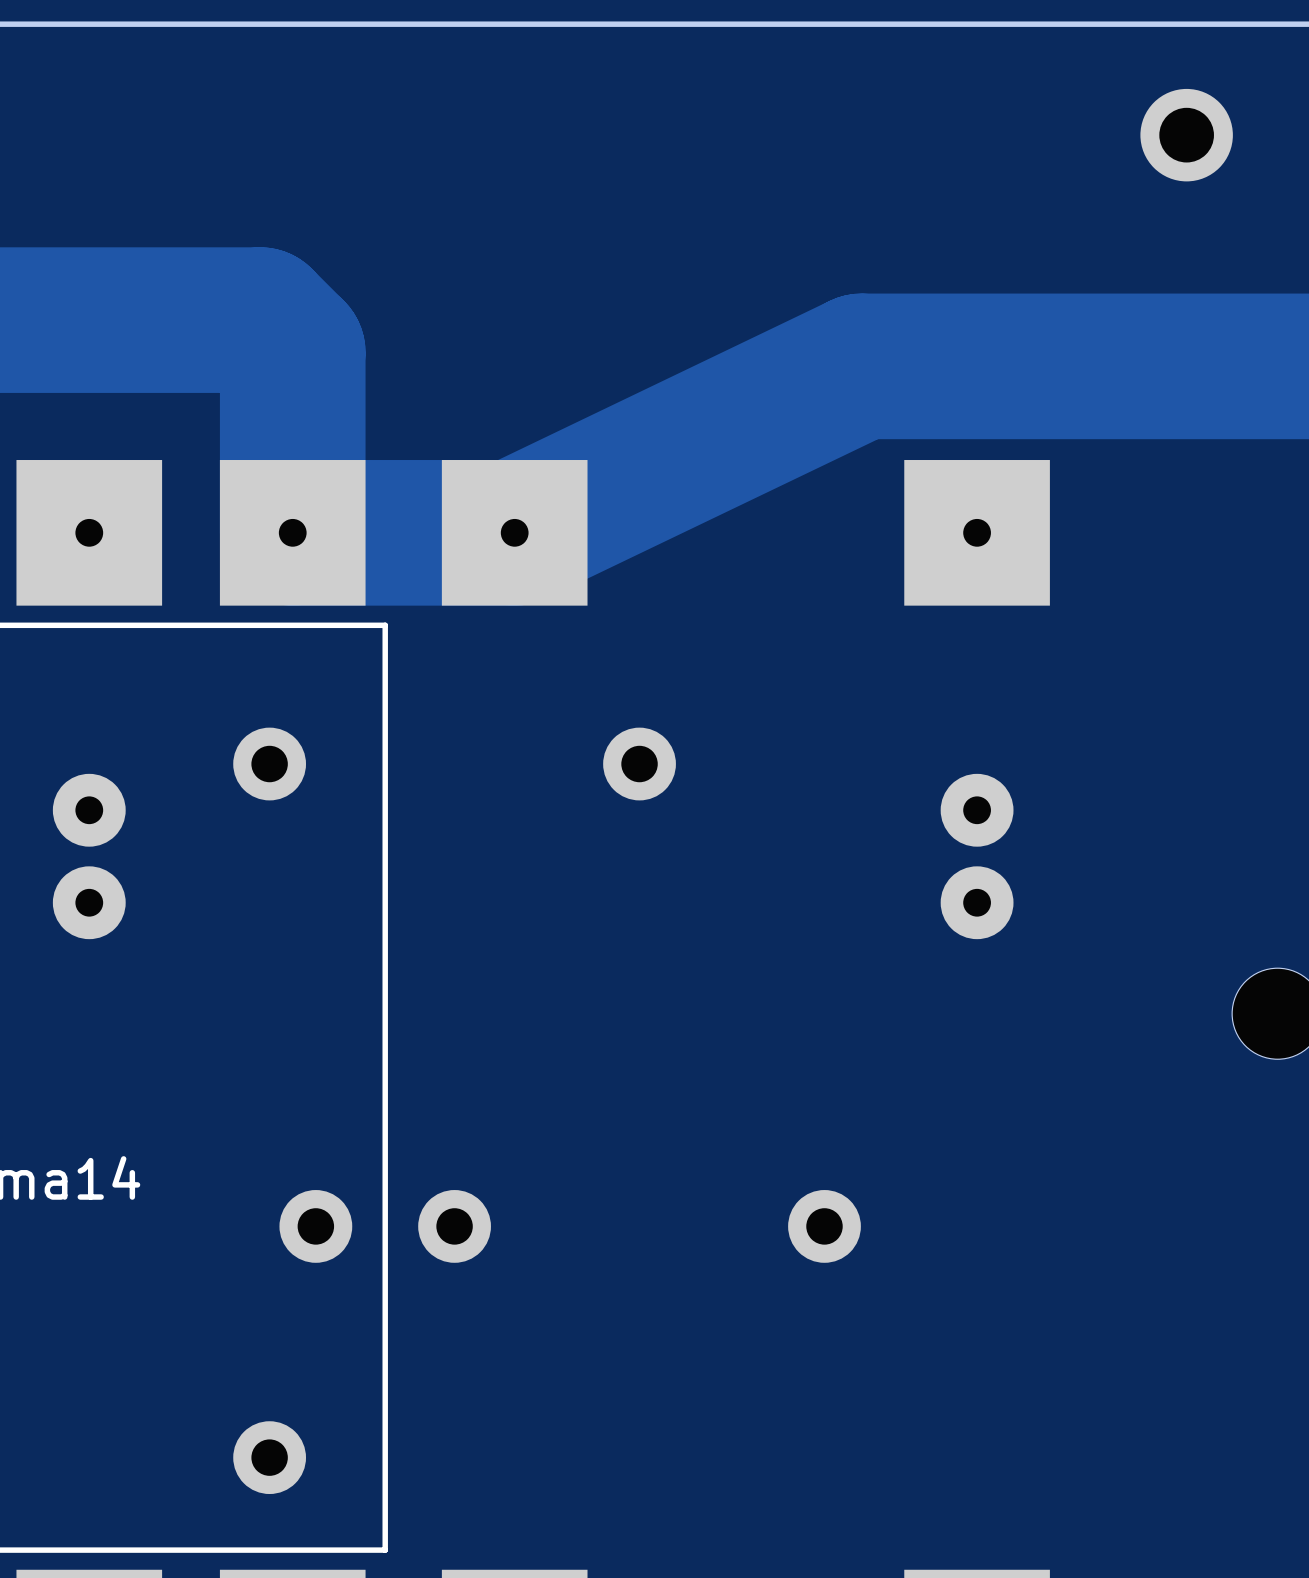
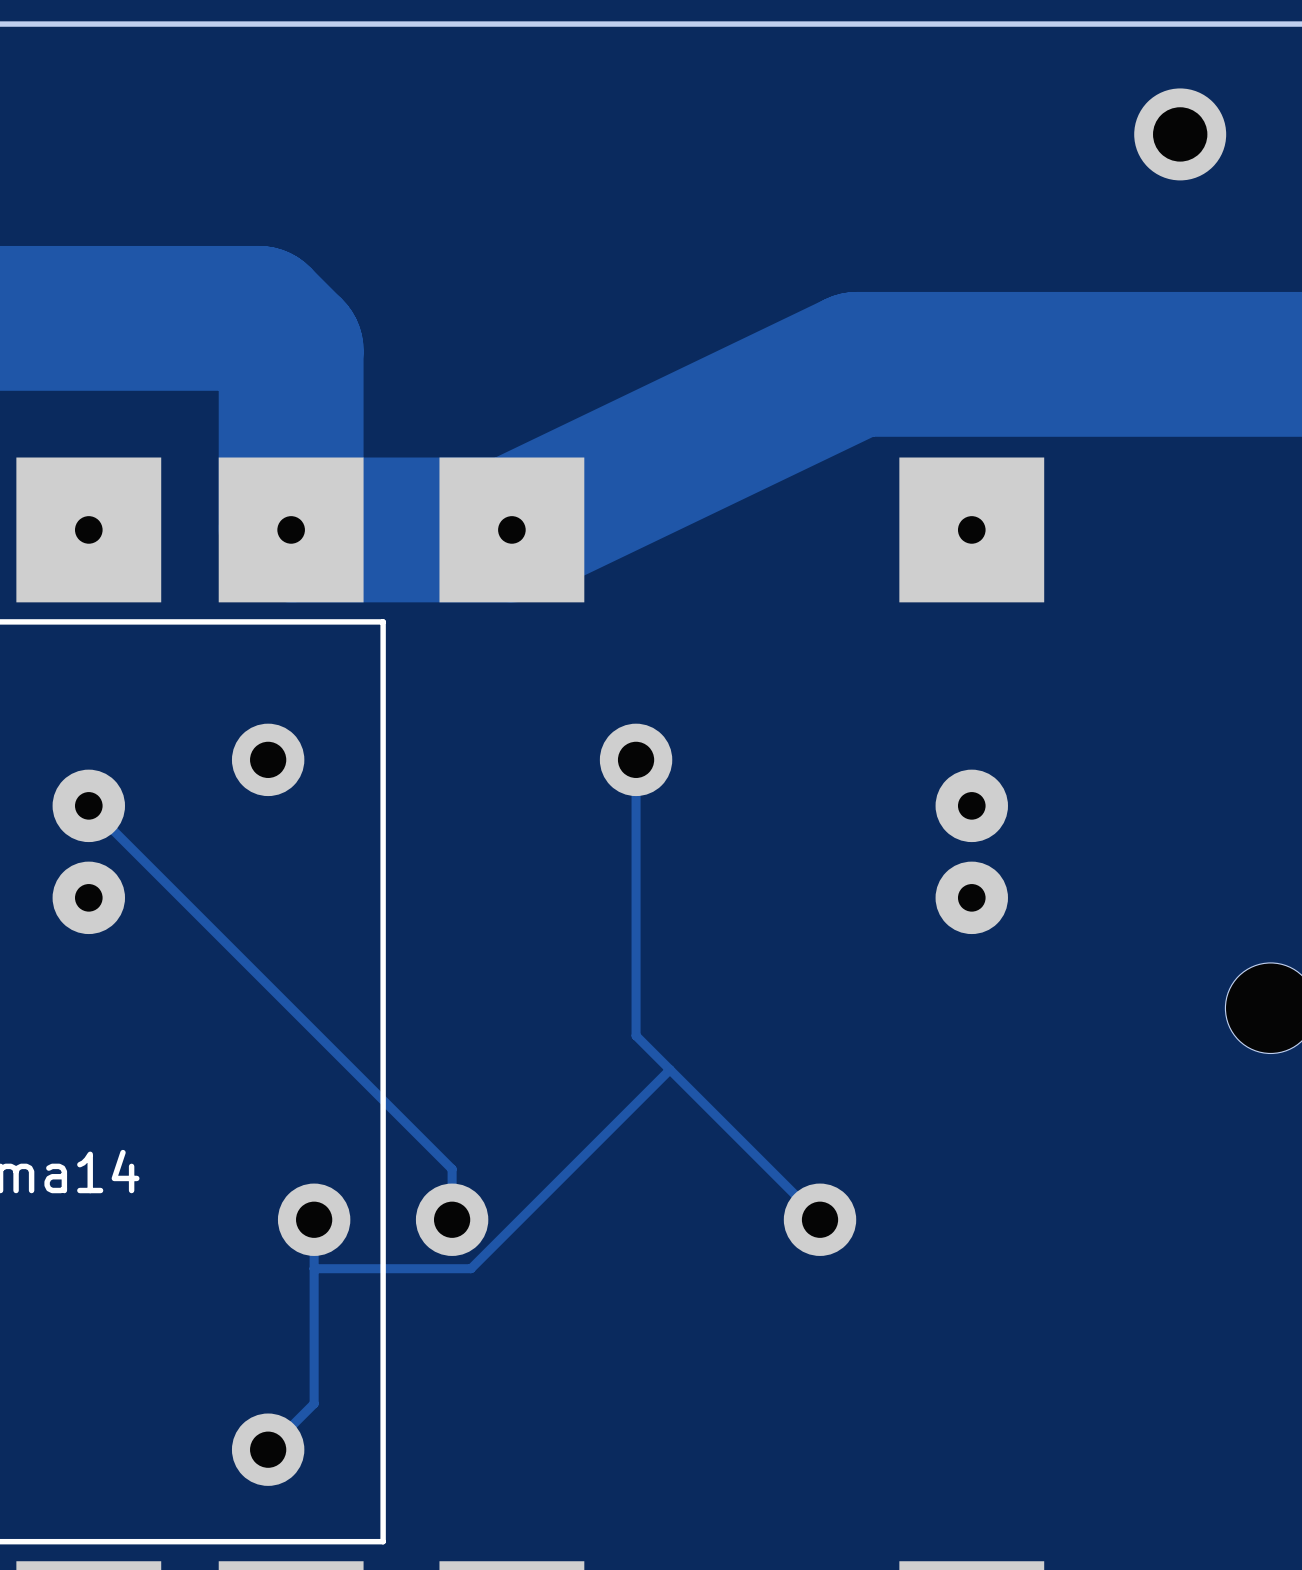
track: none -> (636, 759) (636, 1035) (820, 1219)
track: none -> (88, 805) (452, 1169) (452, 1219)
track: none -> (669, 1069) (471, 1268) (314, 1268)
track: none -> (314, 1219) (314, 1403) (268, 1449)

